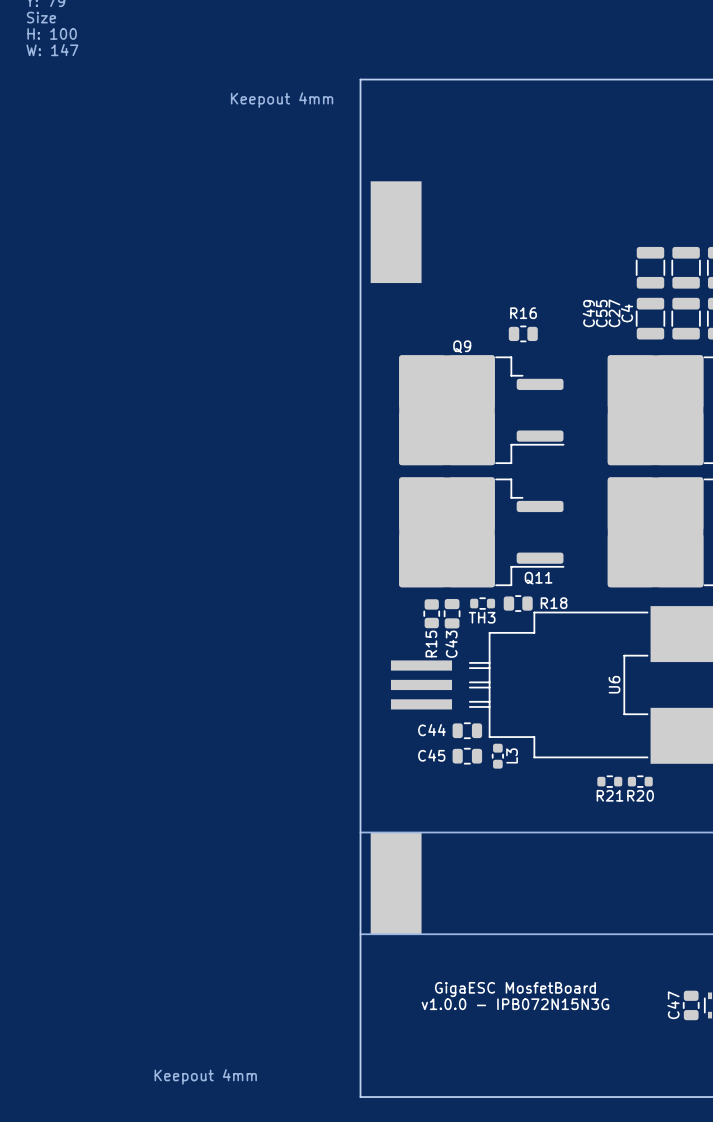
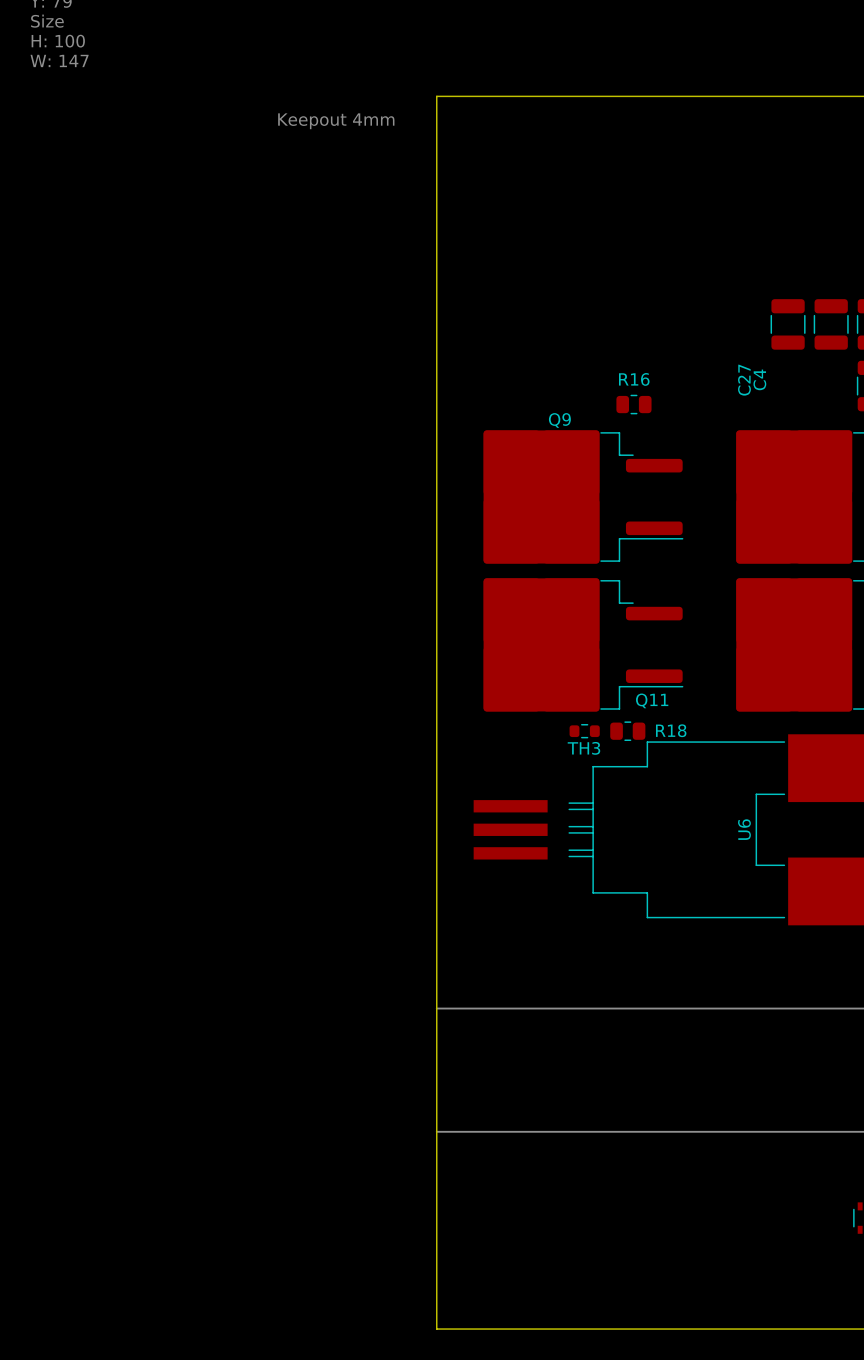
part: (396, 232) -> none
C49: (650, 318) -> none
C55: (686, 318) -> none
R15: (431, 613) -> none
C43: (452, 613) -> none
C44: (467, 730) -> none
C45: (467, 756) -> none
L3: (497, 756) -> none
R21: (609, 781) -> none
R20: (640, 781) -> none
part: (396, 883) -> none
text: GigaESC MosfetBoard (515, 989) -> none
text: v1.0.0 - IPB072N15N3G (515, 1004) -> none
C47: (691, 1005) -> none
text: Keepout 4mm (205, 1076) -> none

